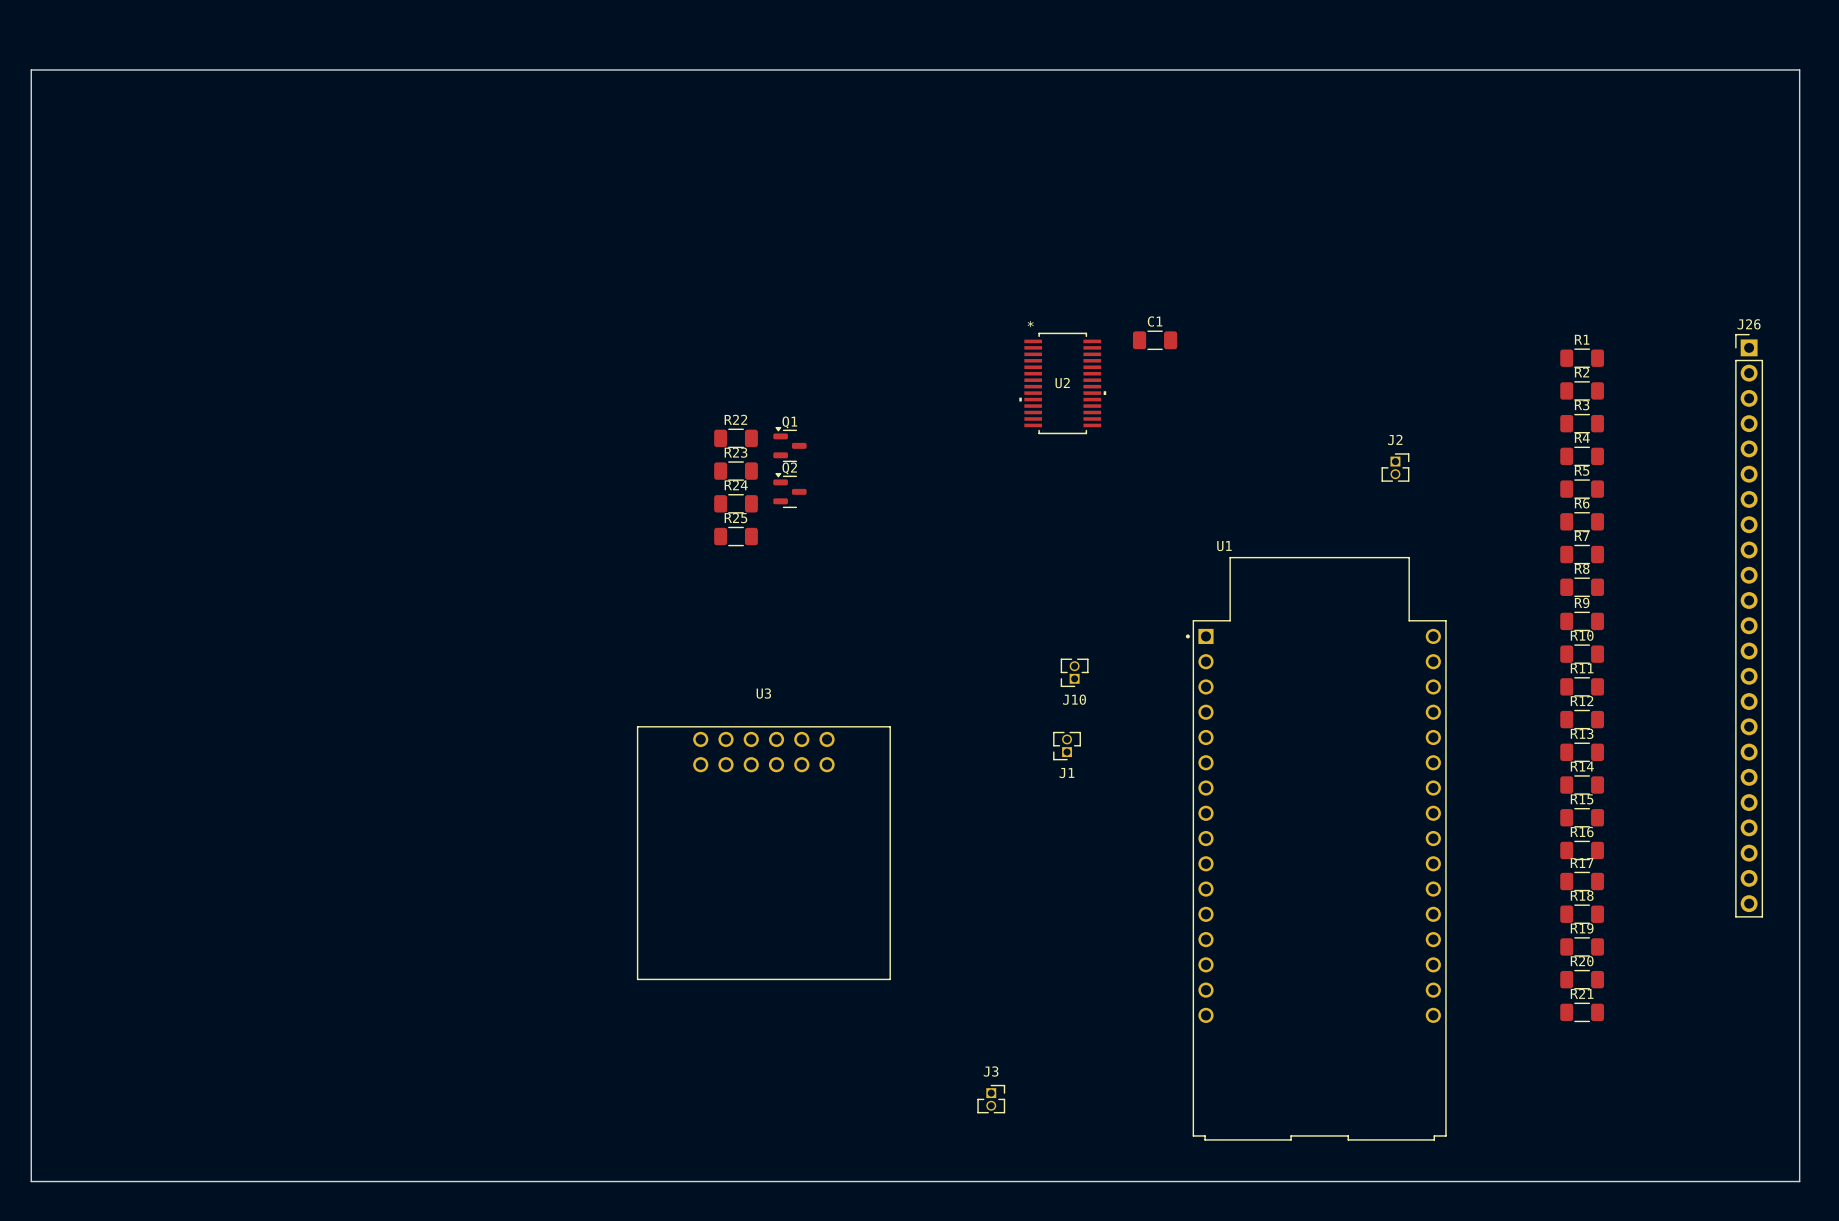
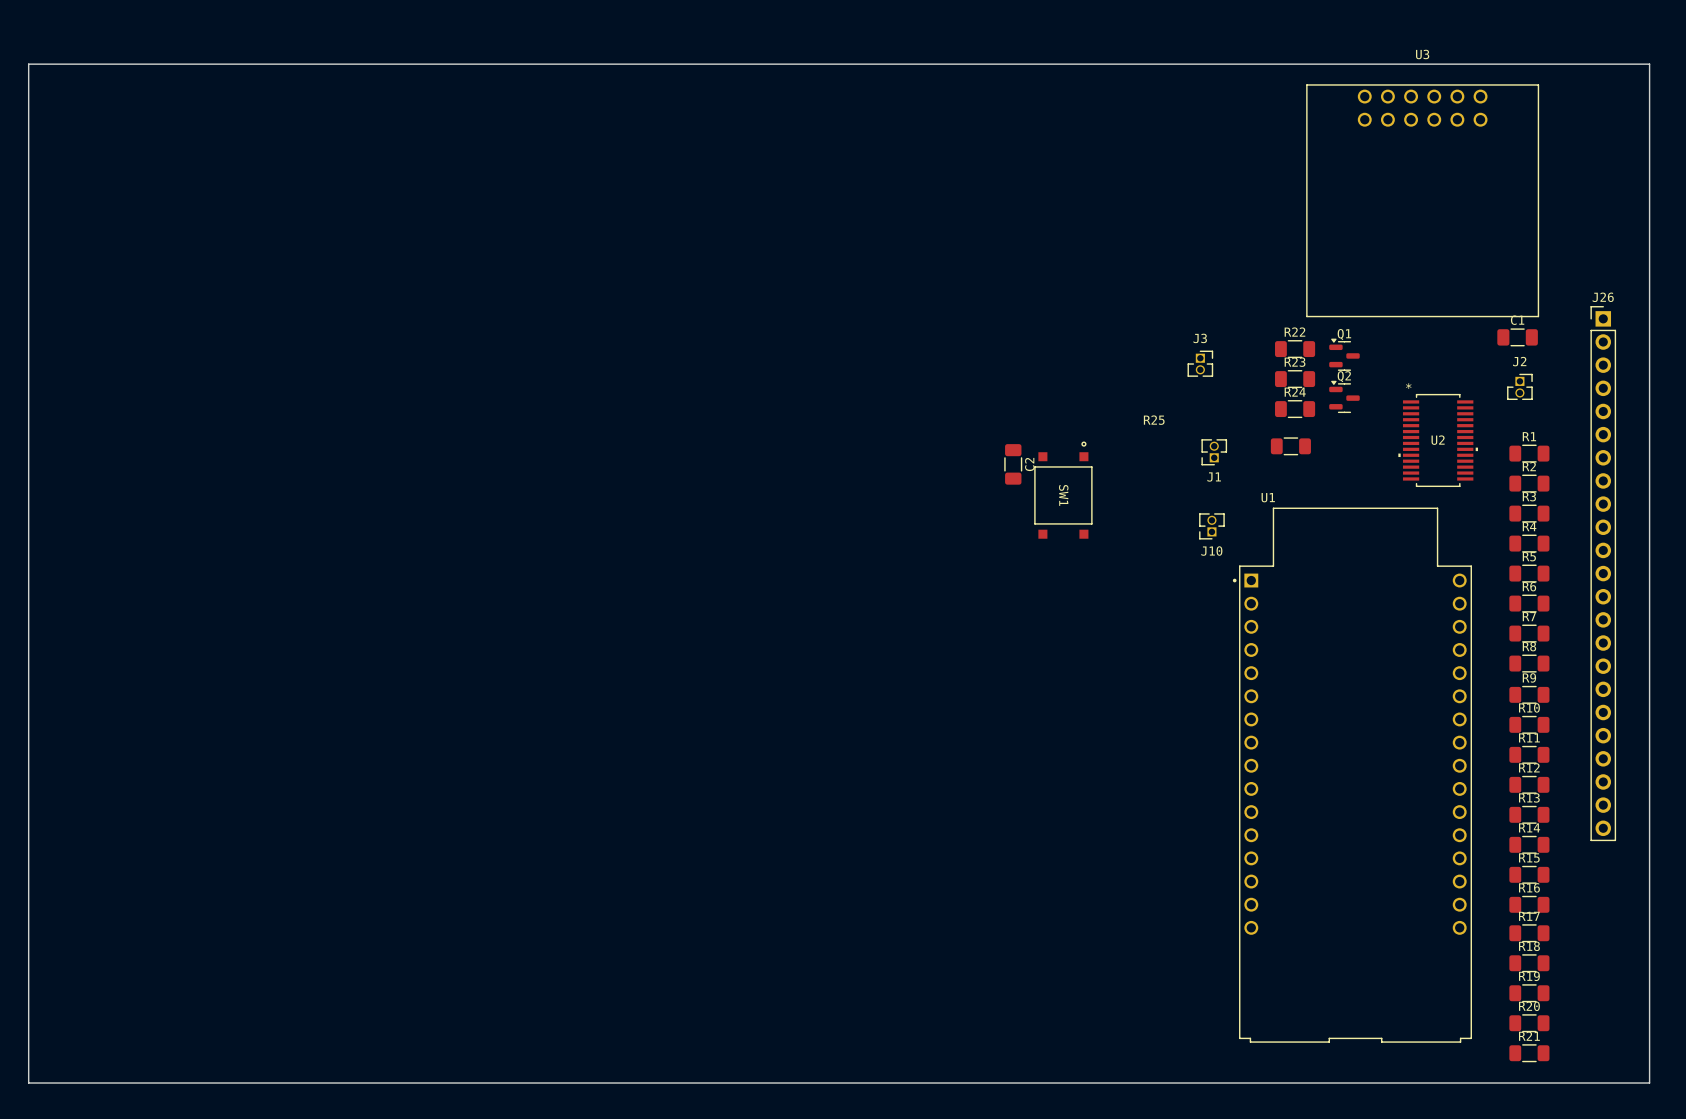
C1 position: (1155, 340) -> (1517, 337)
R1 position: (1582, 358) -> (1529, 453)
U2 position: (1062, 383) -> (1438, 440)
R2 position: (1582, 390) -> (1529, 483)
R3 position: (1582, 423) -> (1529, 513)
R22 position: (736, 438) -> (1295, 349)
Q1 position: (789, 444) -> (1344, 354)
R4 position: (1582, 456) -> (1529, 543)
J2 position: (1395, 467) -> (1519, 386)
R23 position: (736, 471) -> (1295, 379)
R5 position: (1582, 489) -> (1529, 573)
Q2 position: (789, 490) -> (1344, 396)
R24 position: (736, 503) -> (1295, 409)
C2: none -> (1013, 464)
R25 name position: R25 (735, 518) -> R25 (1154, 420)
R6 position: (1582, 521) -> (1529, 603)
SW1: none -> (1063, 490)
R25 position: (736, 536) -> (1290, 446)
R7 position: (1582, 554) -> (1529, 633)
R8 position: (1582, 587) -> (1529, 663)
R9 position: (1582, 621) -> (1529, 694)
R10 position: (1582, 654) -> (1529, 724)
J10 position: (1074, 672) -> (1211, 526)
R11 position: (1582, 686) -> (1529, 754)
R12 position: (1582, 719) -> (1529, 784)
J1 position: (1067, 746) -> (1214, 452)
R13 position: (1582, 752) -> (1529, 814)
R14 position: (1582, 785) -> (1529, 844)
R15 position: (1582, 817) -> (1529, 874)
U1 position: (1316, 848) -> (1352, 775)
R16 position: (1582, 850) -> (1529, 904)
U3 position: (763, 853) -> (1422, 200)
R17 position: (1582, 881) -> (1529, 933)
R18 position: (1582, 914) -> (1529, 963)
R19 position: (1582, 946) -> (1529, 993)
R20 position: (1582, 979) -> (1529, 1023)
R21 position: (1582, 1012) -> (1529, 1053)
J3 position: (991, 1099) -> (1200, 363)

